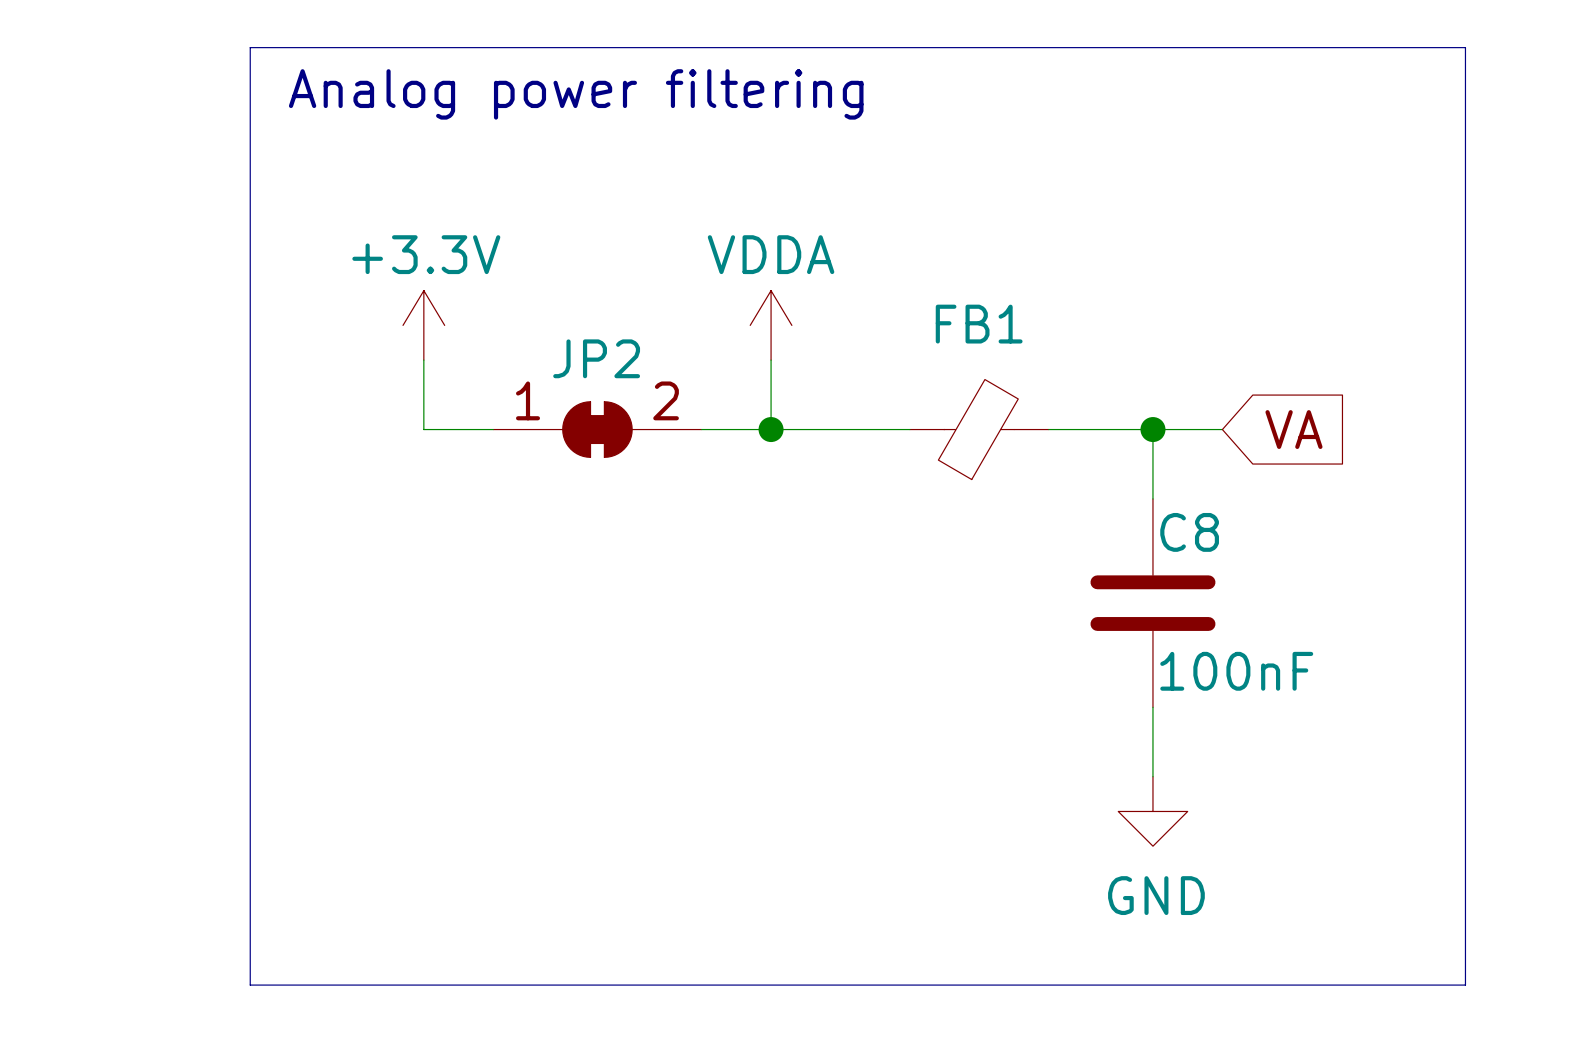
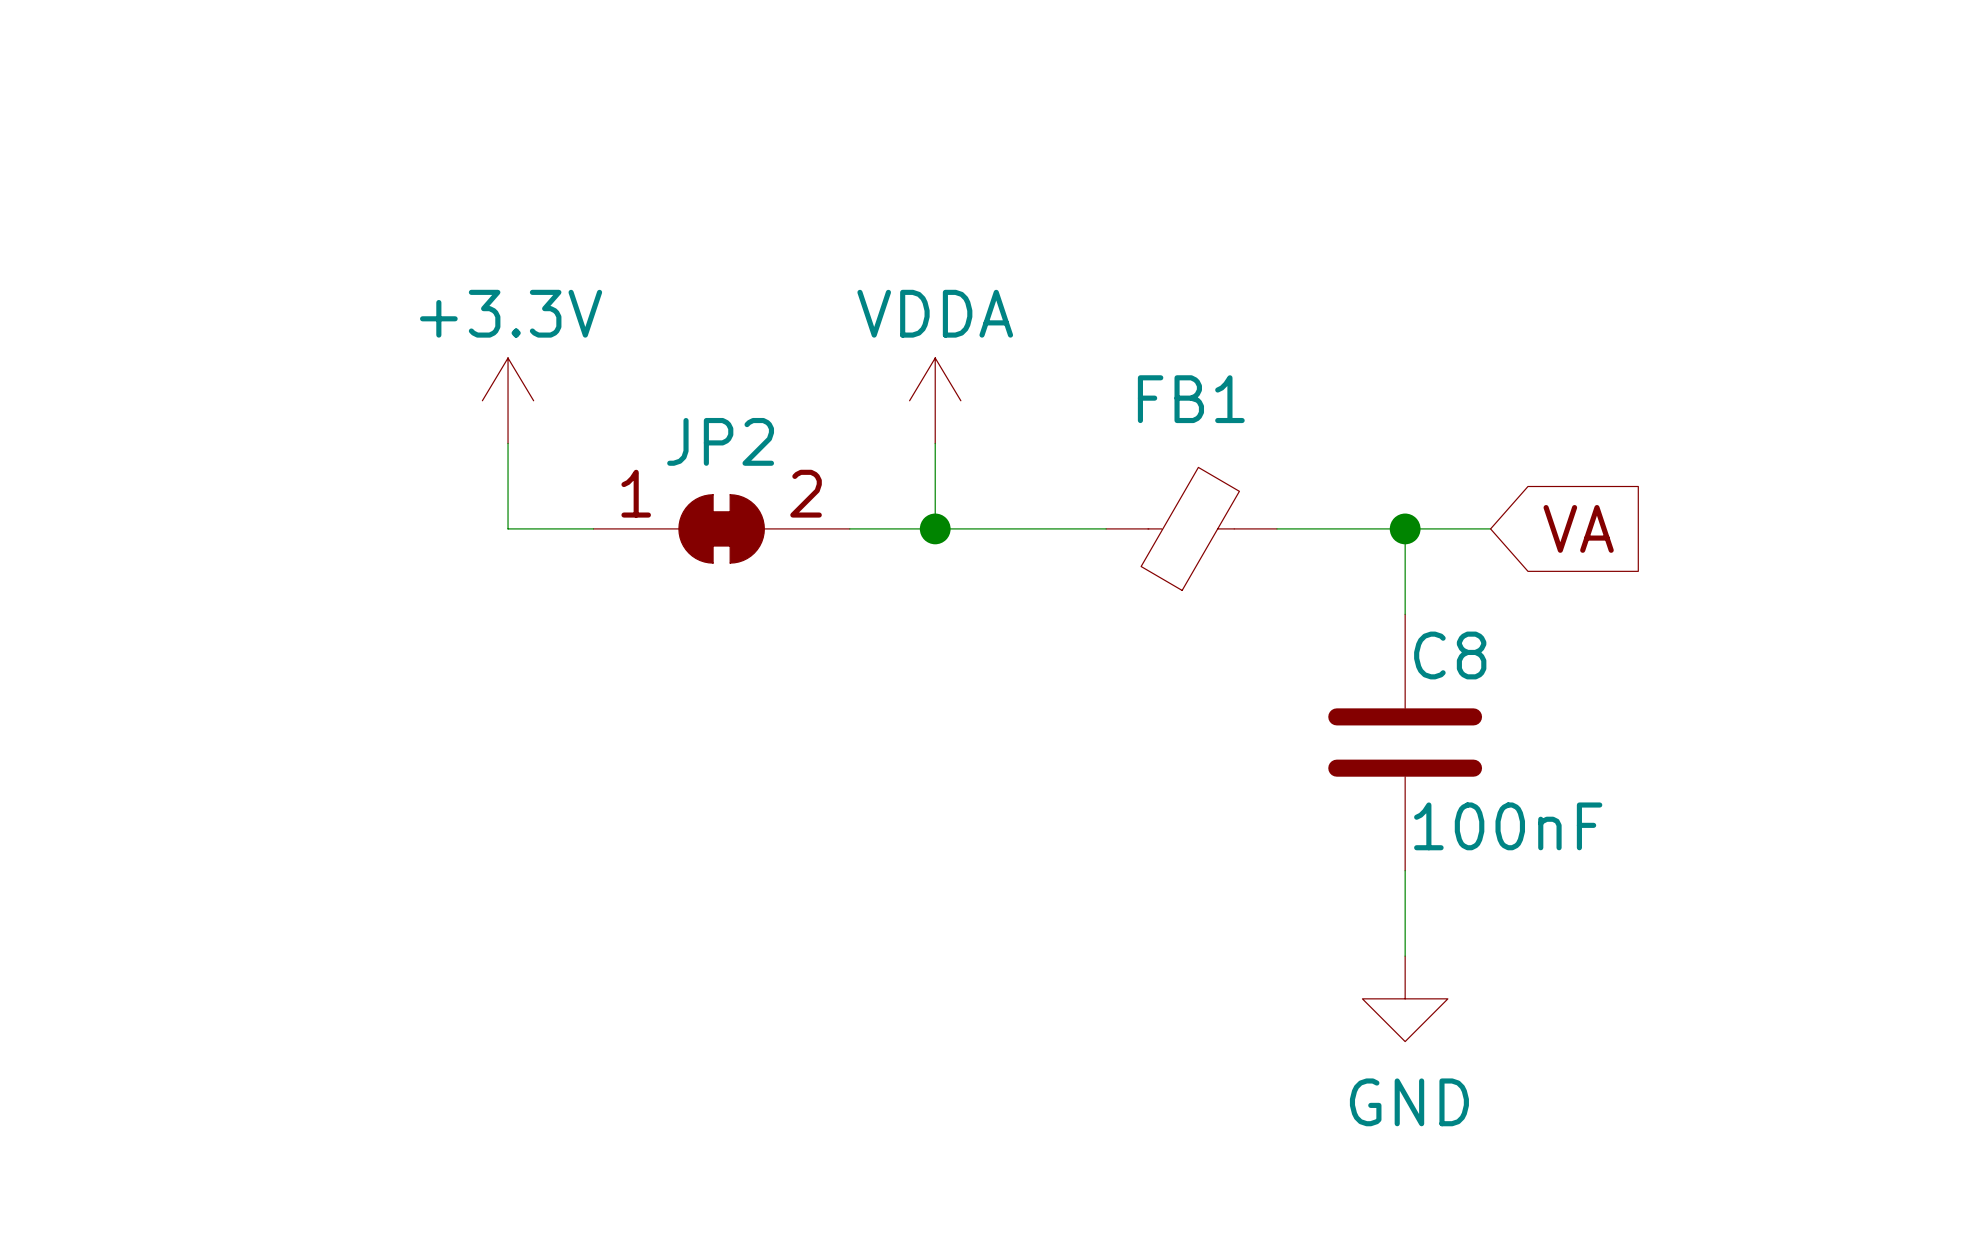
line: (250, 47) (250, 985) (1465, 985) (1465, 47) (250, 47) -> none
text: Analog power filtering (576, 94) -> none

